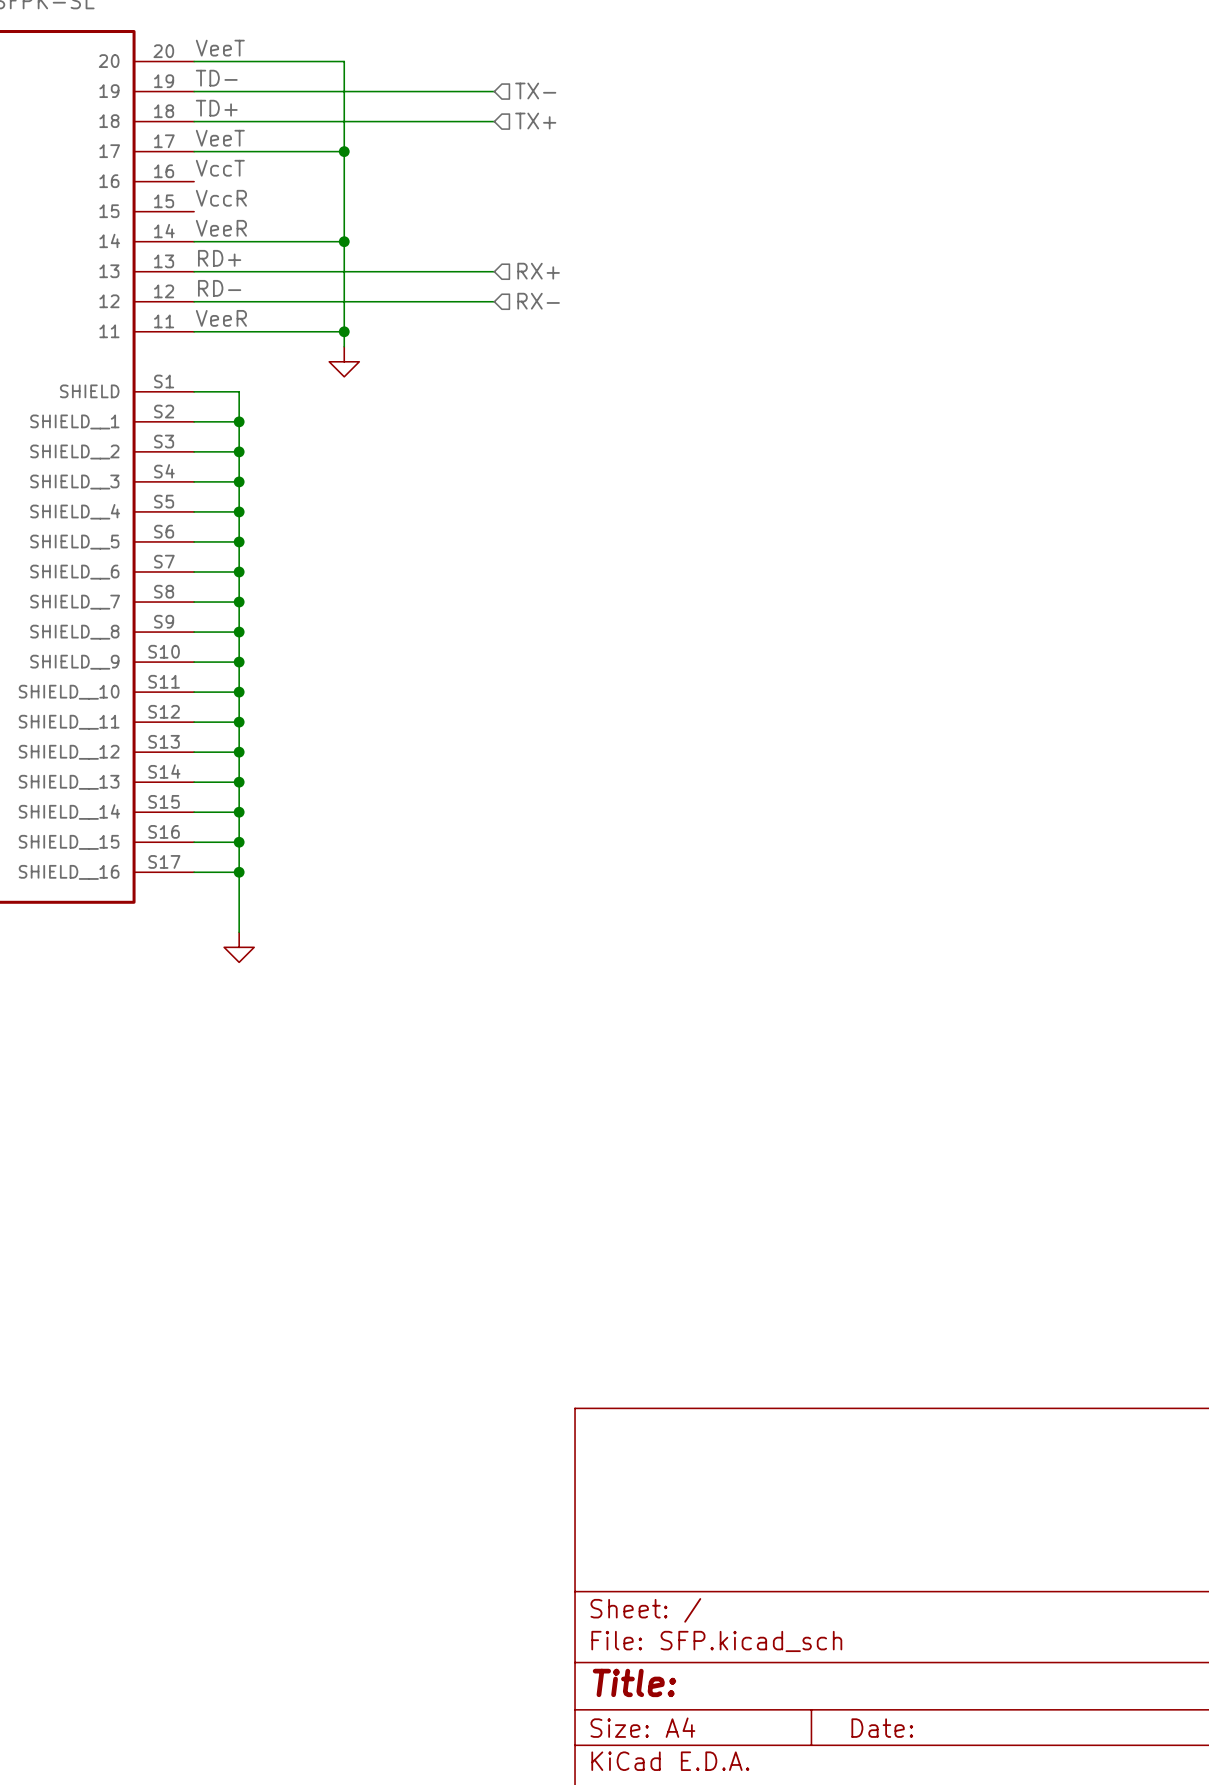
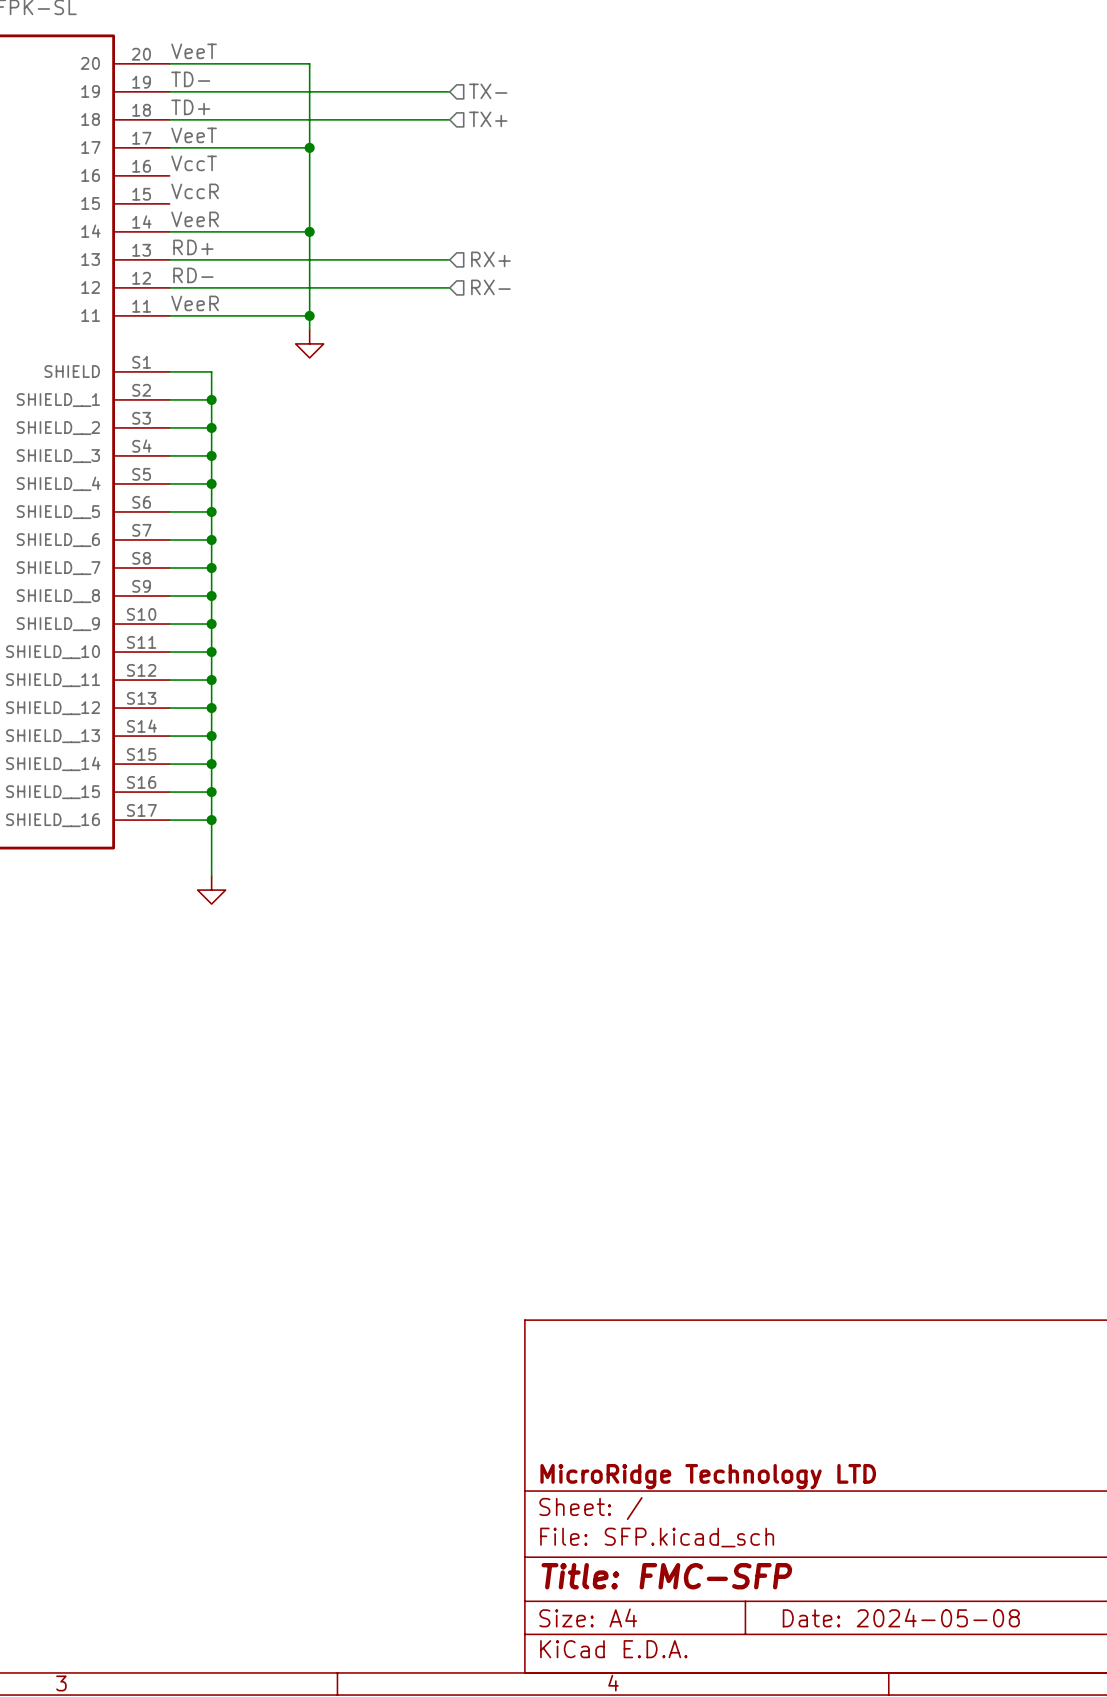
title block: none -> MicroRidge Technology LTD (708, 1476)
title block: Title: (634, 1682) -> Title: FMC-SFP (666, 1576)
title block: Date: (882, 1728) -> Date: 2024-05-08 (901, 1617)

